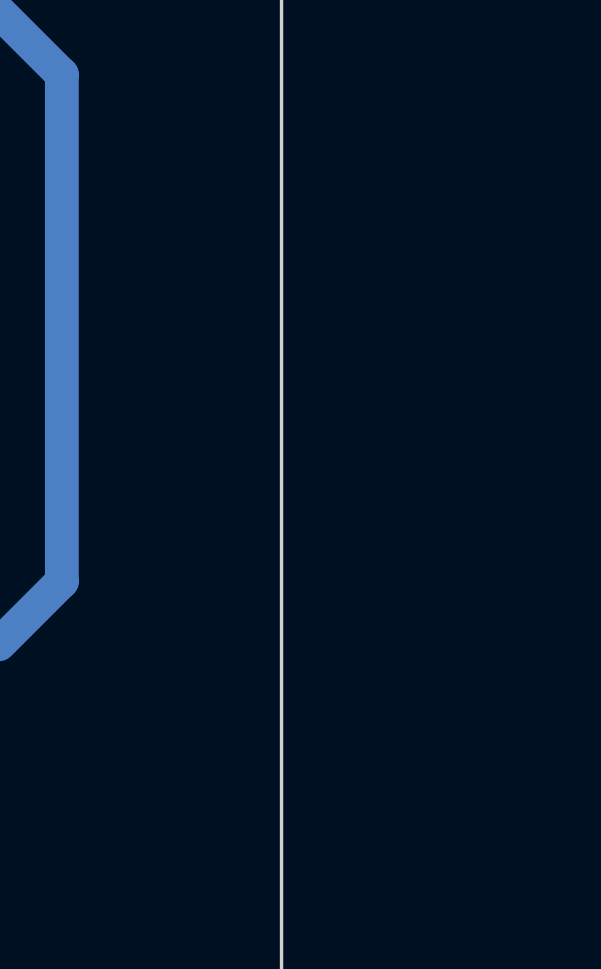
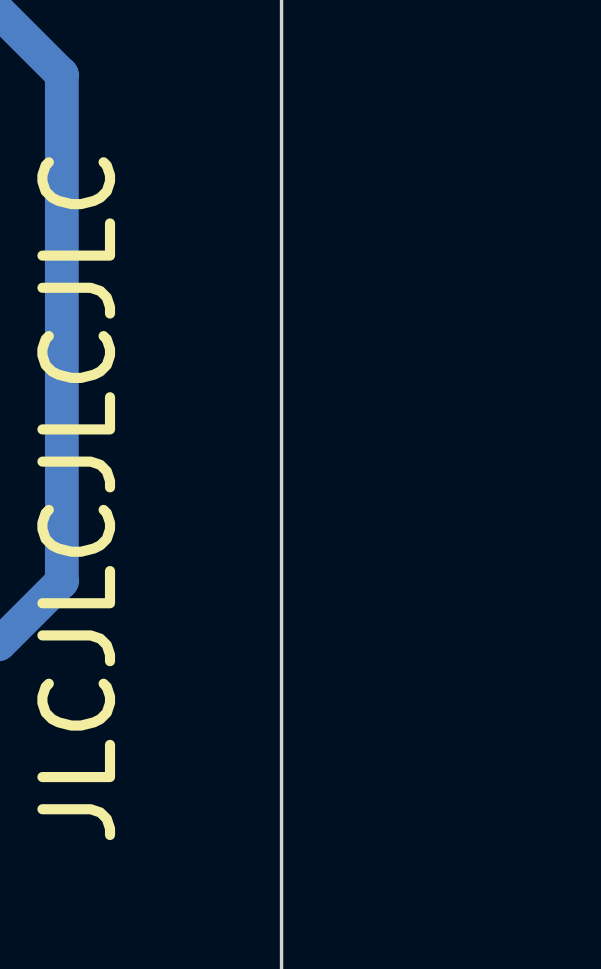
text: none -> JLCJLCJLCJLC (76, 498)

